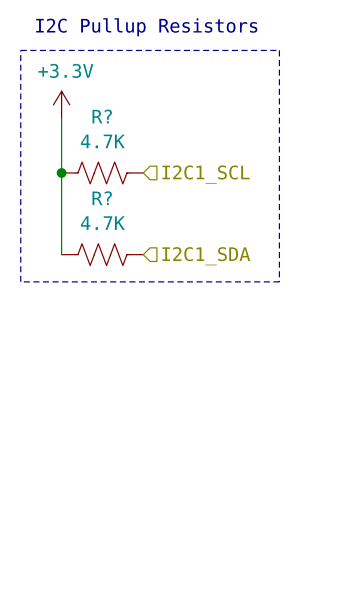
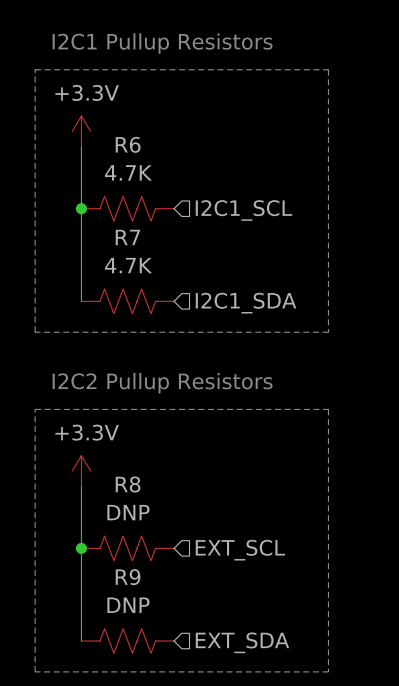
text: I2C Pullup Resistors (146, 27) -> I2C1 Pullup Resistors (162, 43)
R? name: R? (102, 116) -> R6 (128, 144)
R? name: R? (102, 198) -> R7 (127, 237)
text: none -> I2C2 Pullup Resistors (162, 383)
line: none -> (35, 409) (328, 409) (328, 671) (35, 671) (35, 409)
power symbol: none -> +3.3V (81, 471)
wire: none -> (81, 486) (81, 641)
junction: none -> (81, 548)
R8: none -> DNP (127, 548)
hierarchical label: none -> EXT_SCL (240, 550)
R9: none -> DNP (127, 641)
hierarchical label: none -> EXT_SDA (242, 642)

